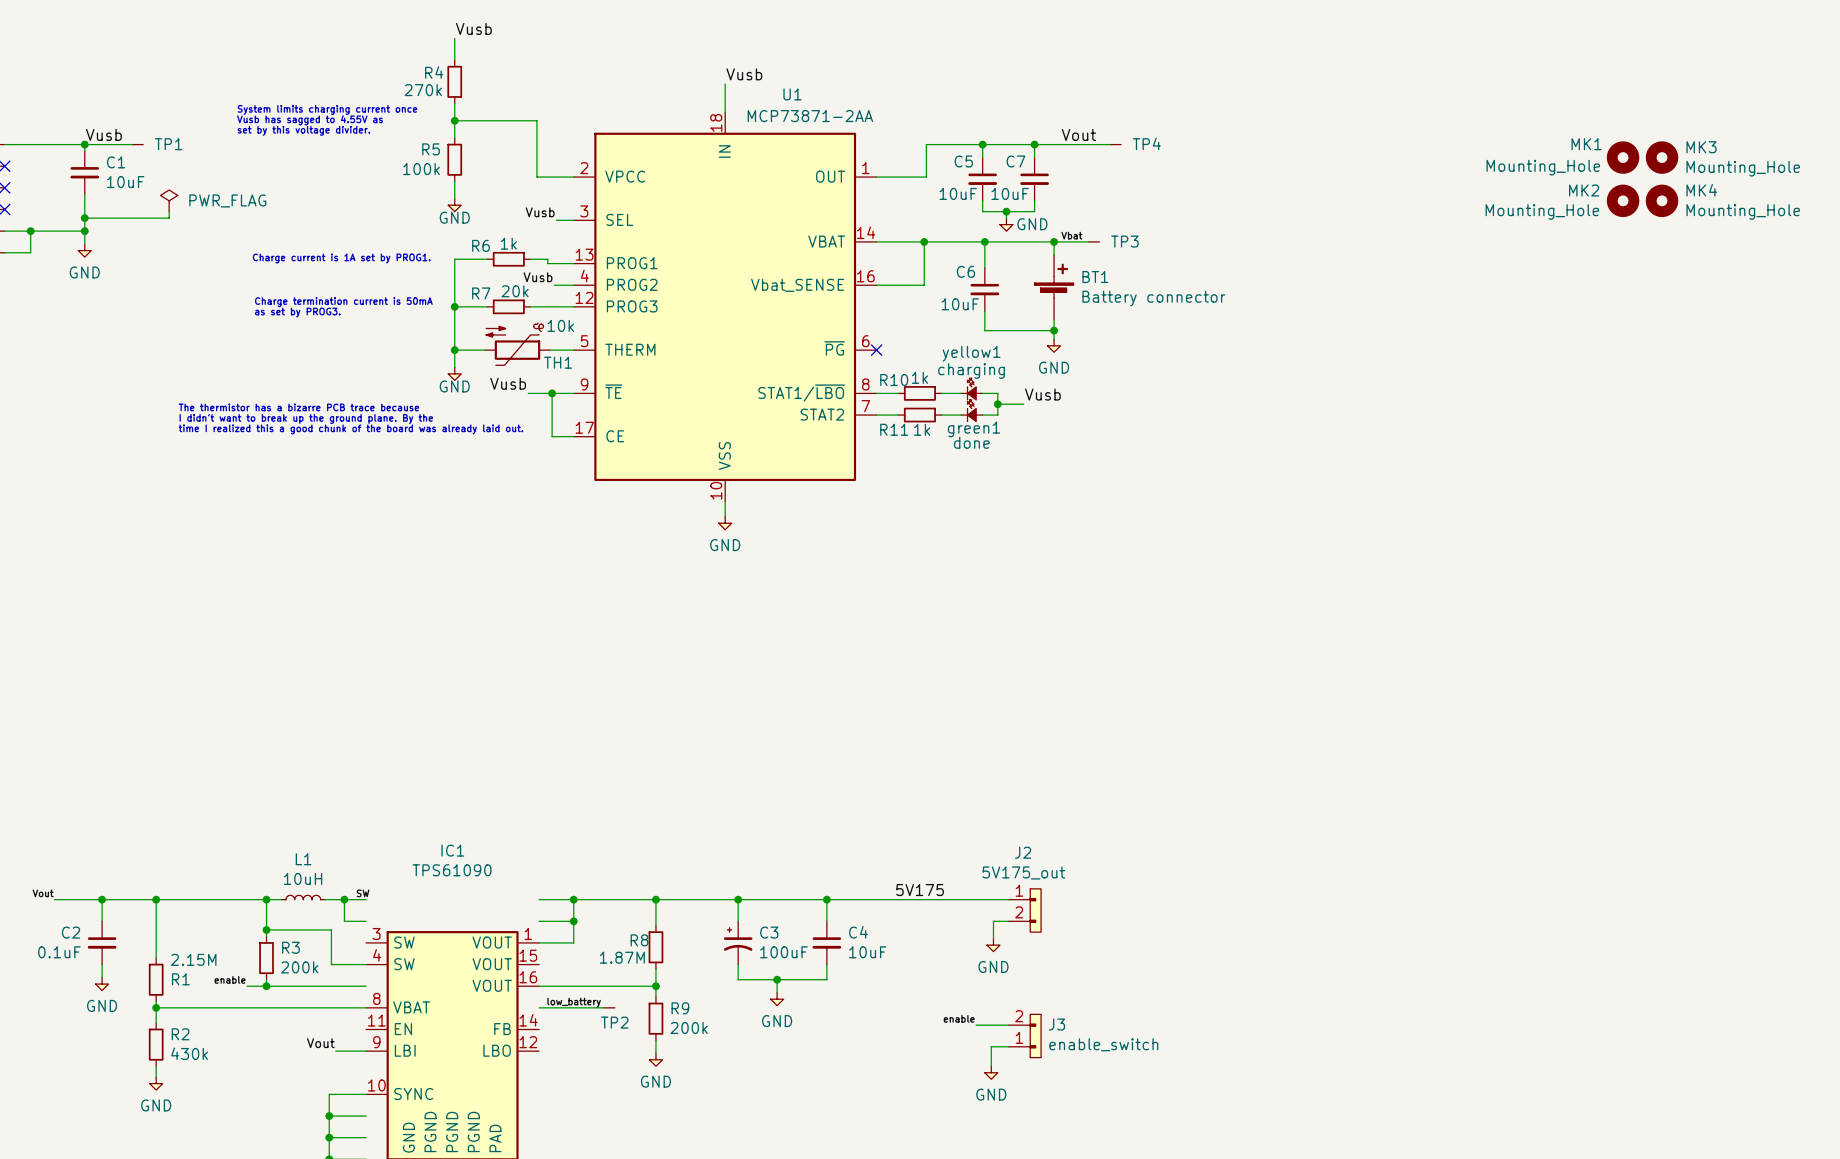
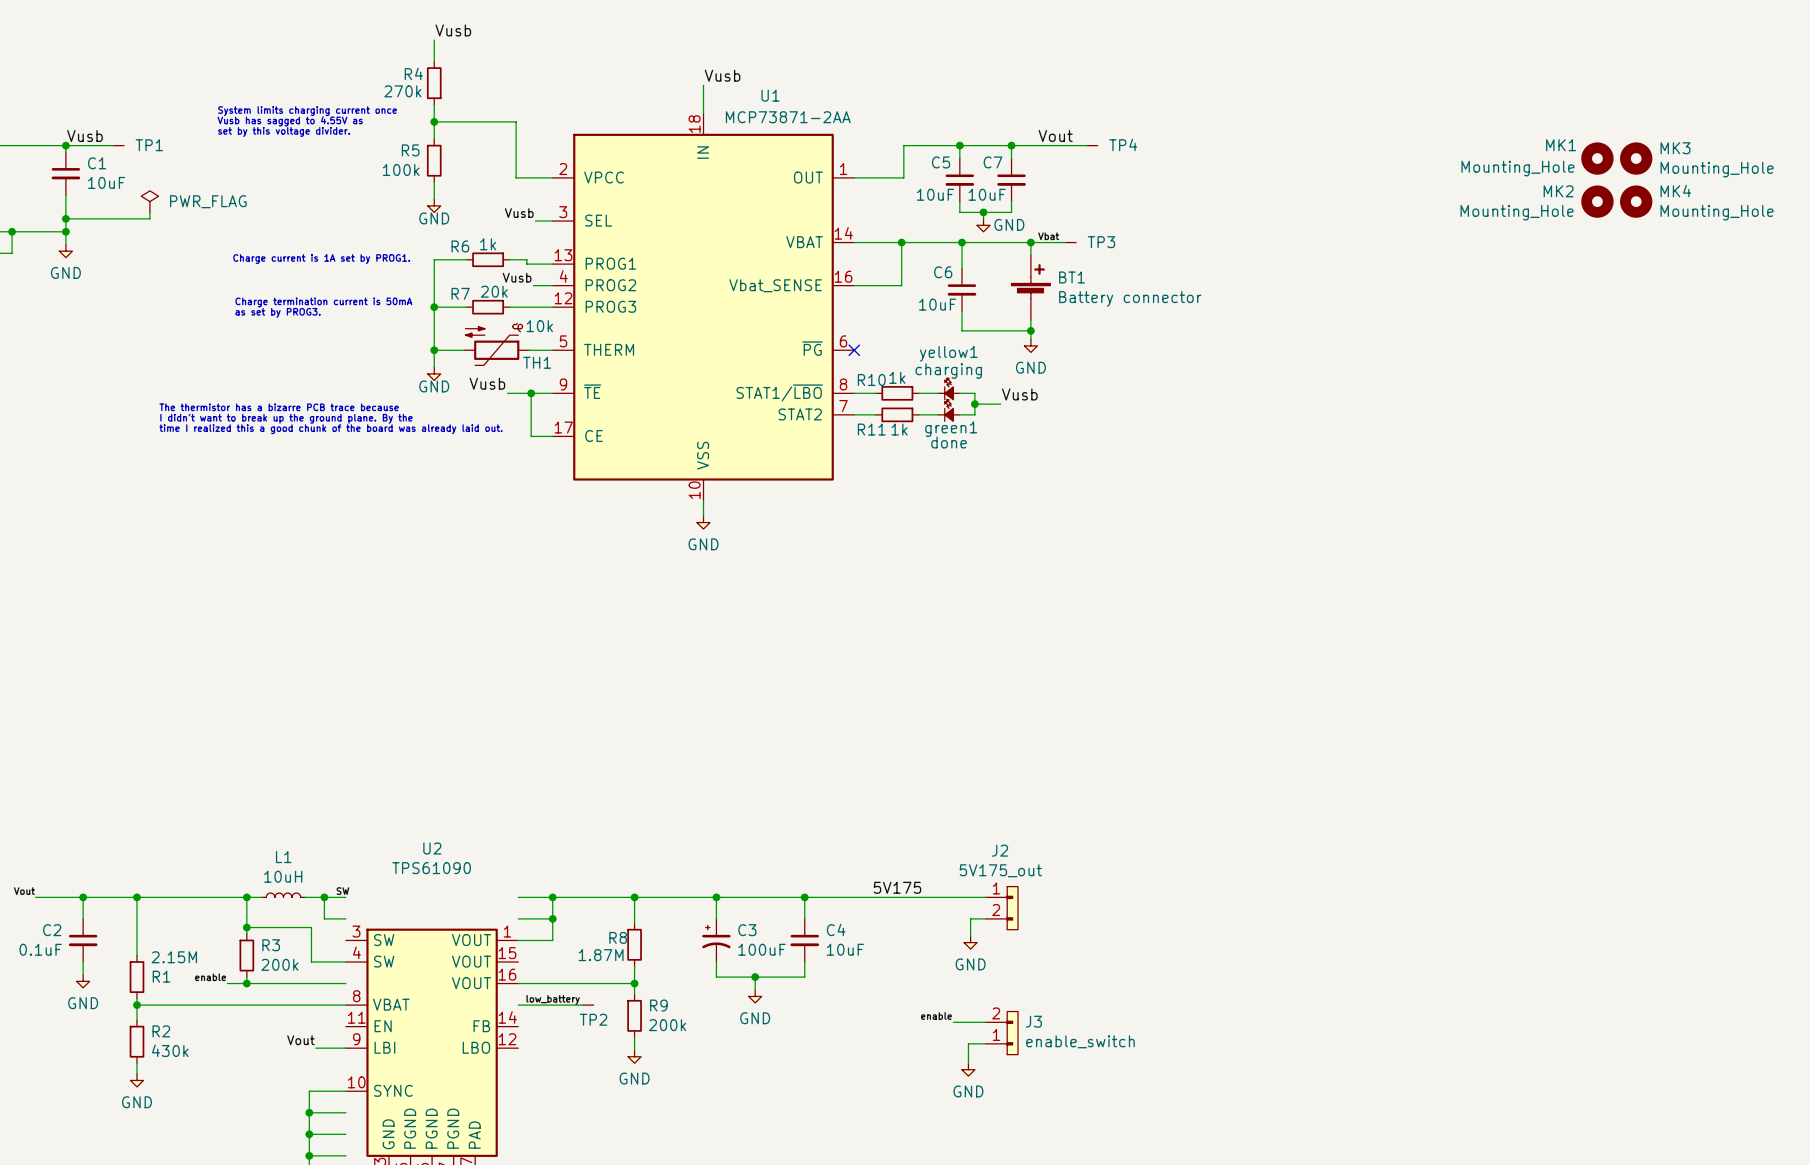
IC1 name: IC1 (452, 850) -> U2 (432, 848)

